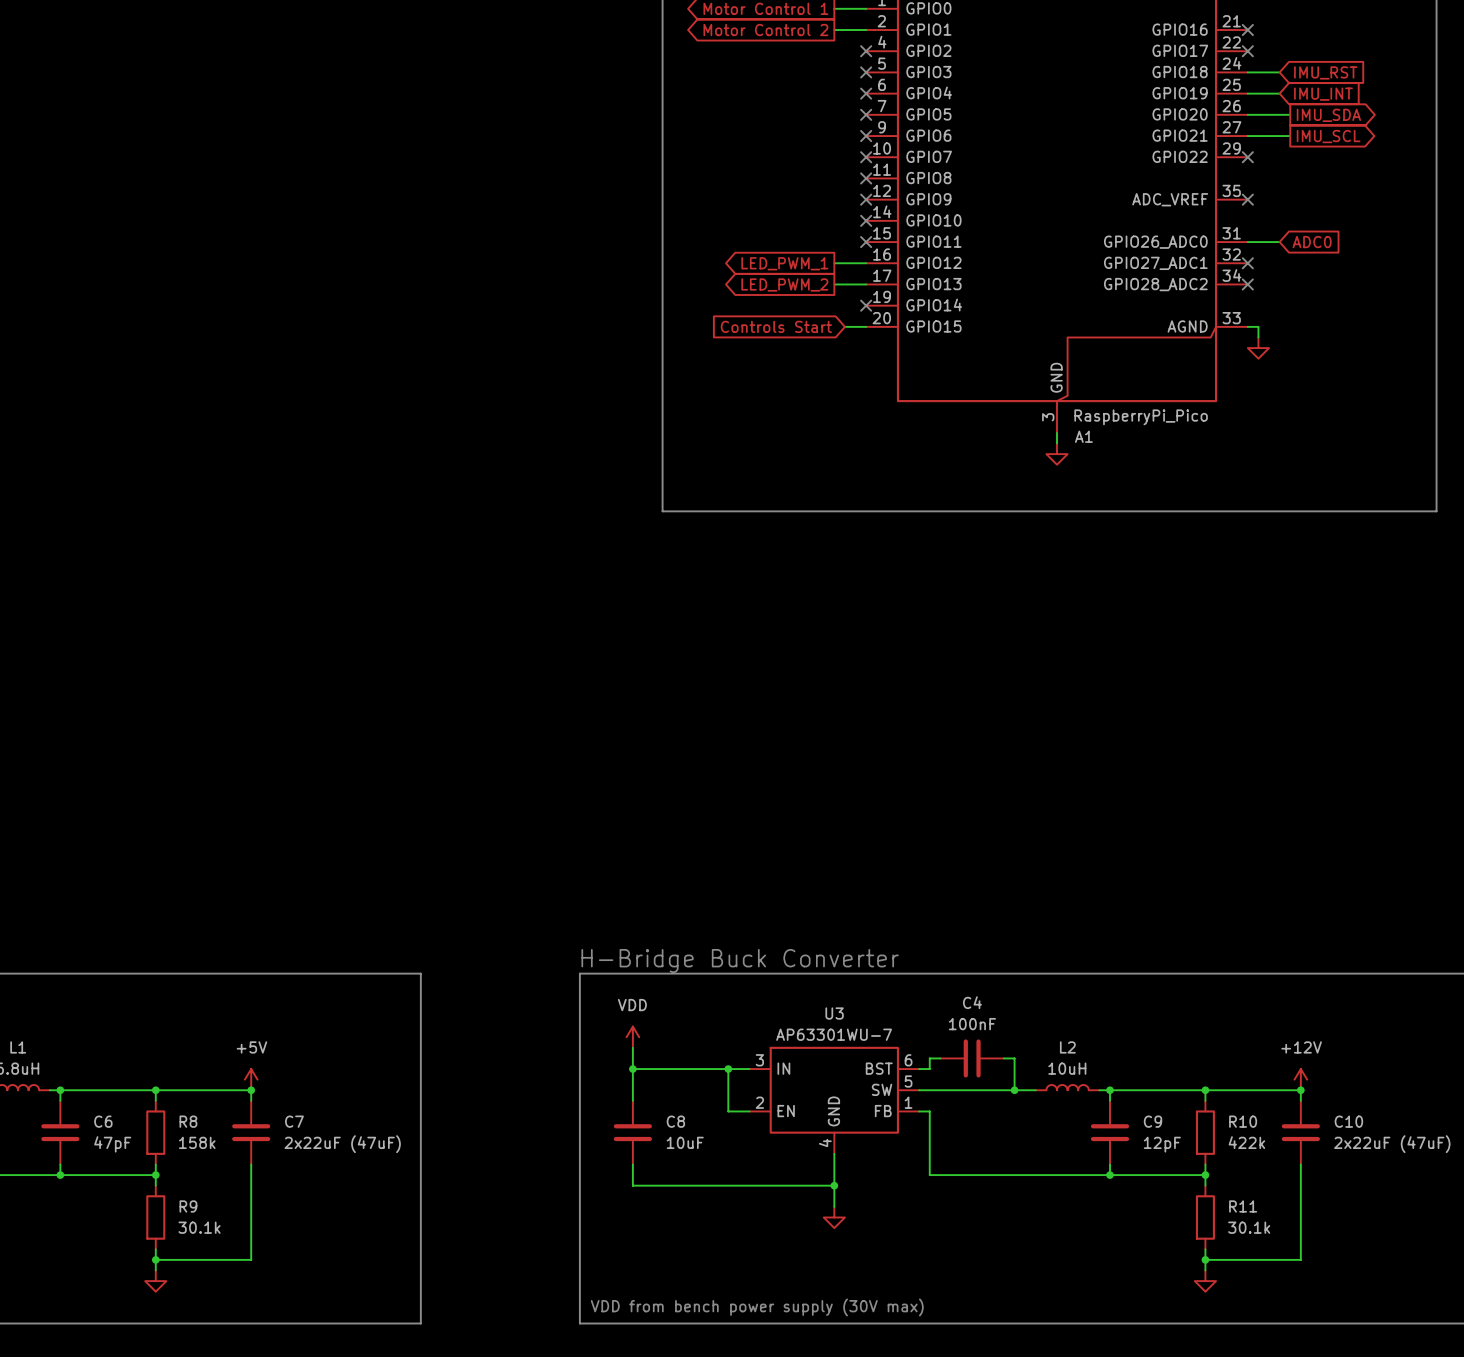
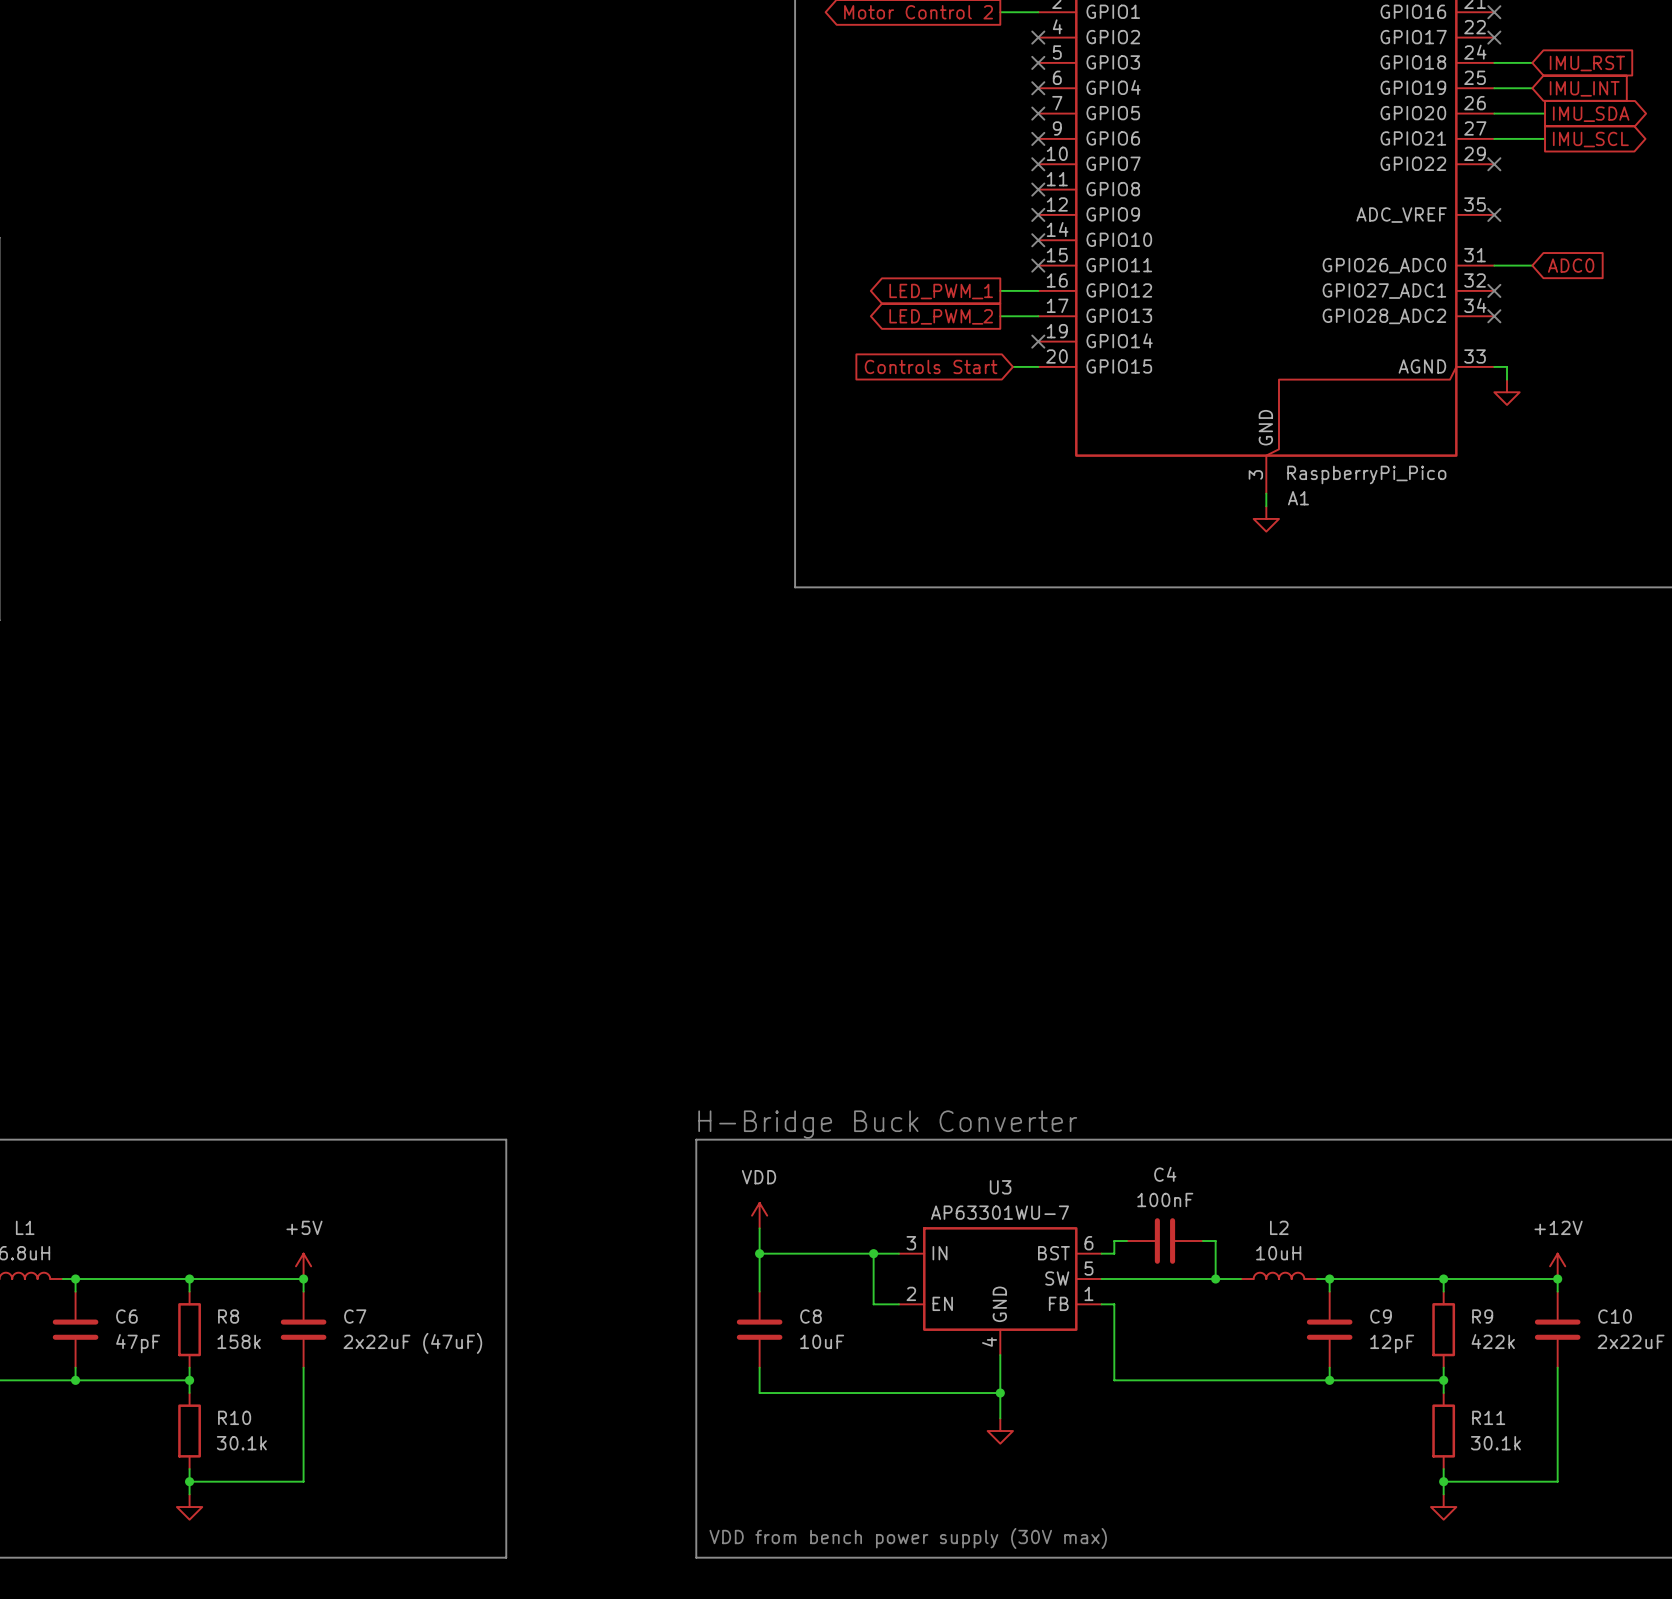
R10 name: R10 (1243, 1121) -> R9 (1482, 1316)
R9 name: R9 (188, 1206) -> R10 (234, 1417)

